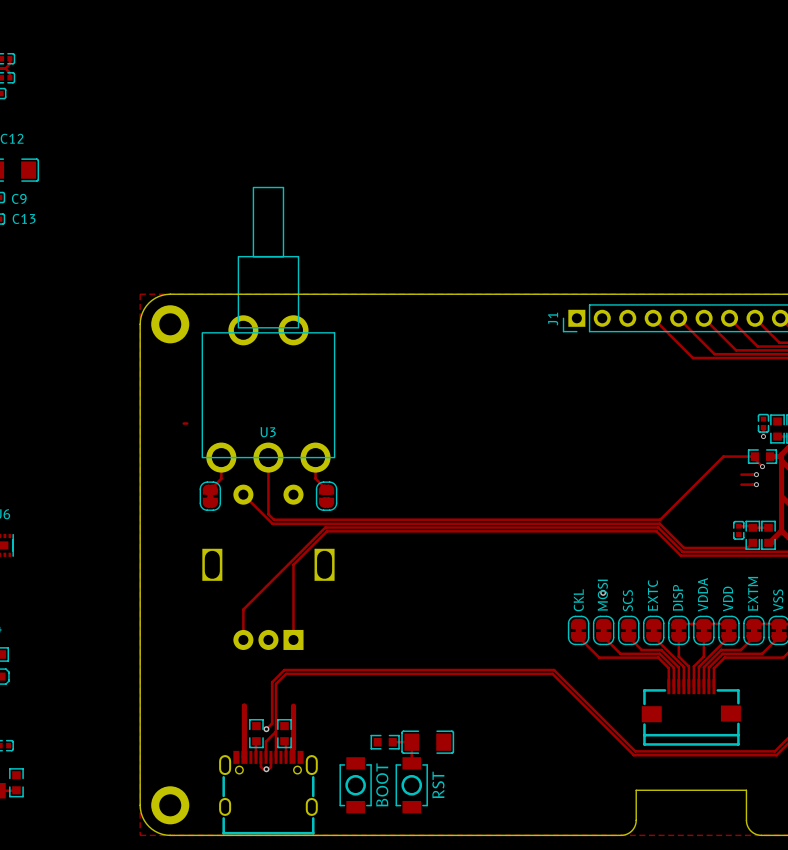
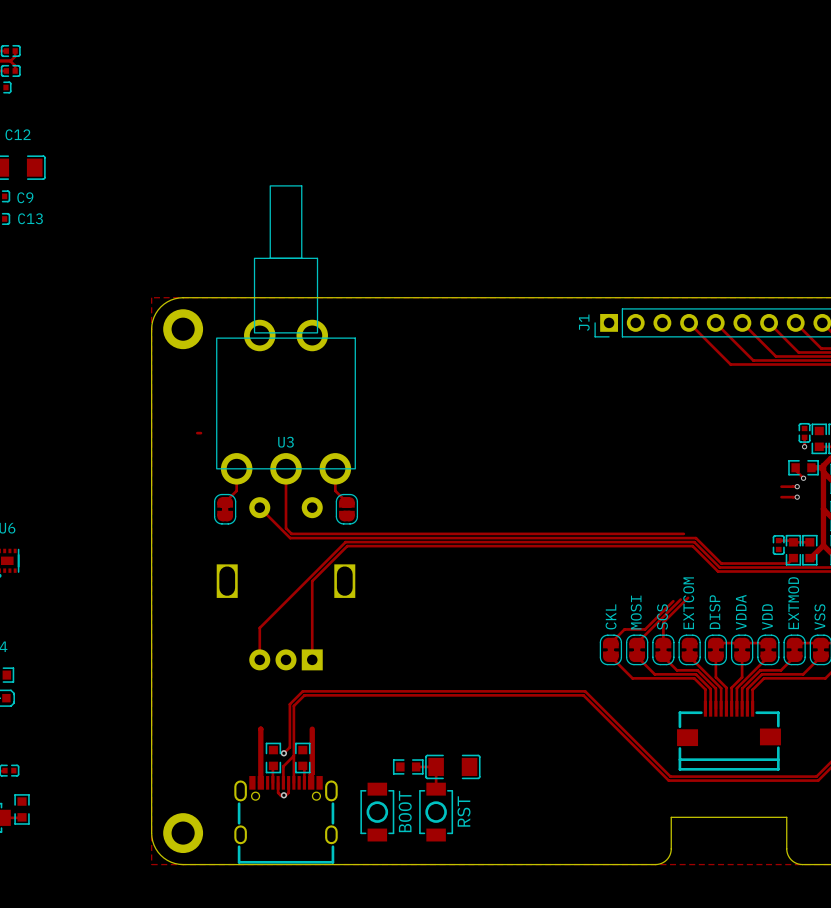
track: (754, 456) (723, 456) (660, 519) (648, 519) -> none
track: none -> (688, 597) (663, 622) (663, 643)
track: none -> (680, 599) (637, 643)
track: none -> (673, 601) (645, 629) (624, 629) (610, 643)
via: (603, 592) -> none
part value: EXTM (753, 593) -> EXTMOD (793, 603)
part value: EXTC (652, 595) -> EXTCOM (688, 603)

